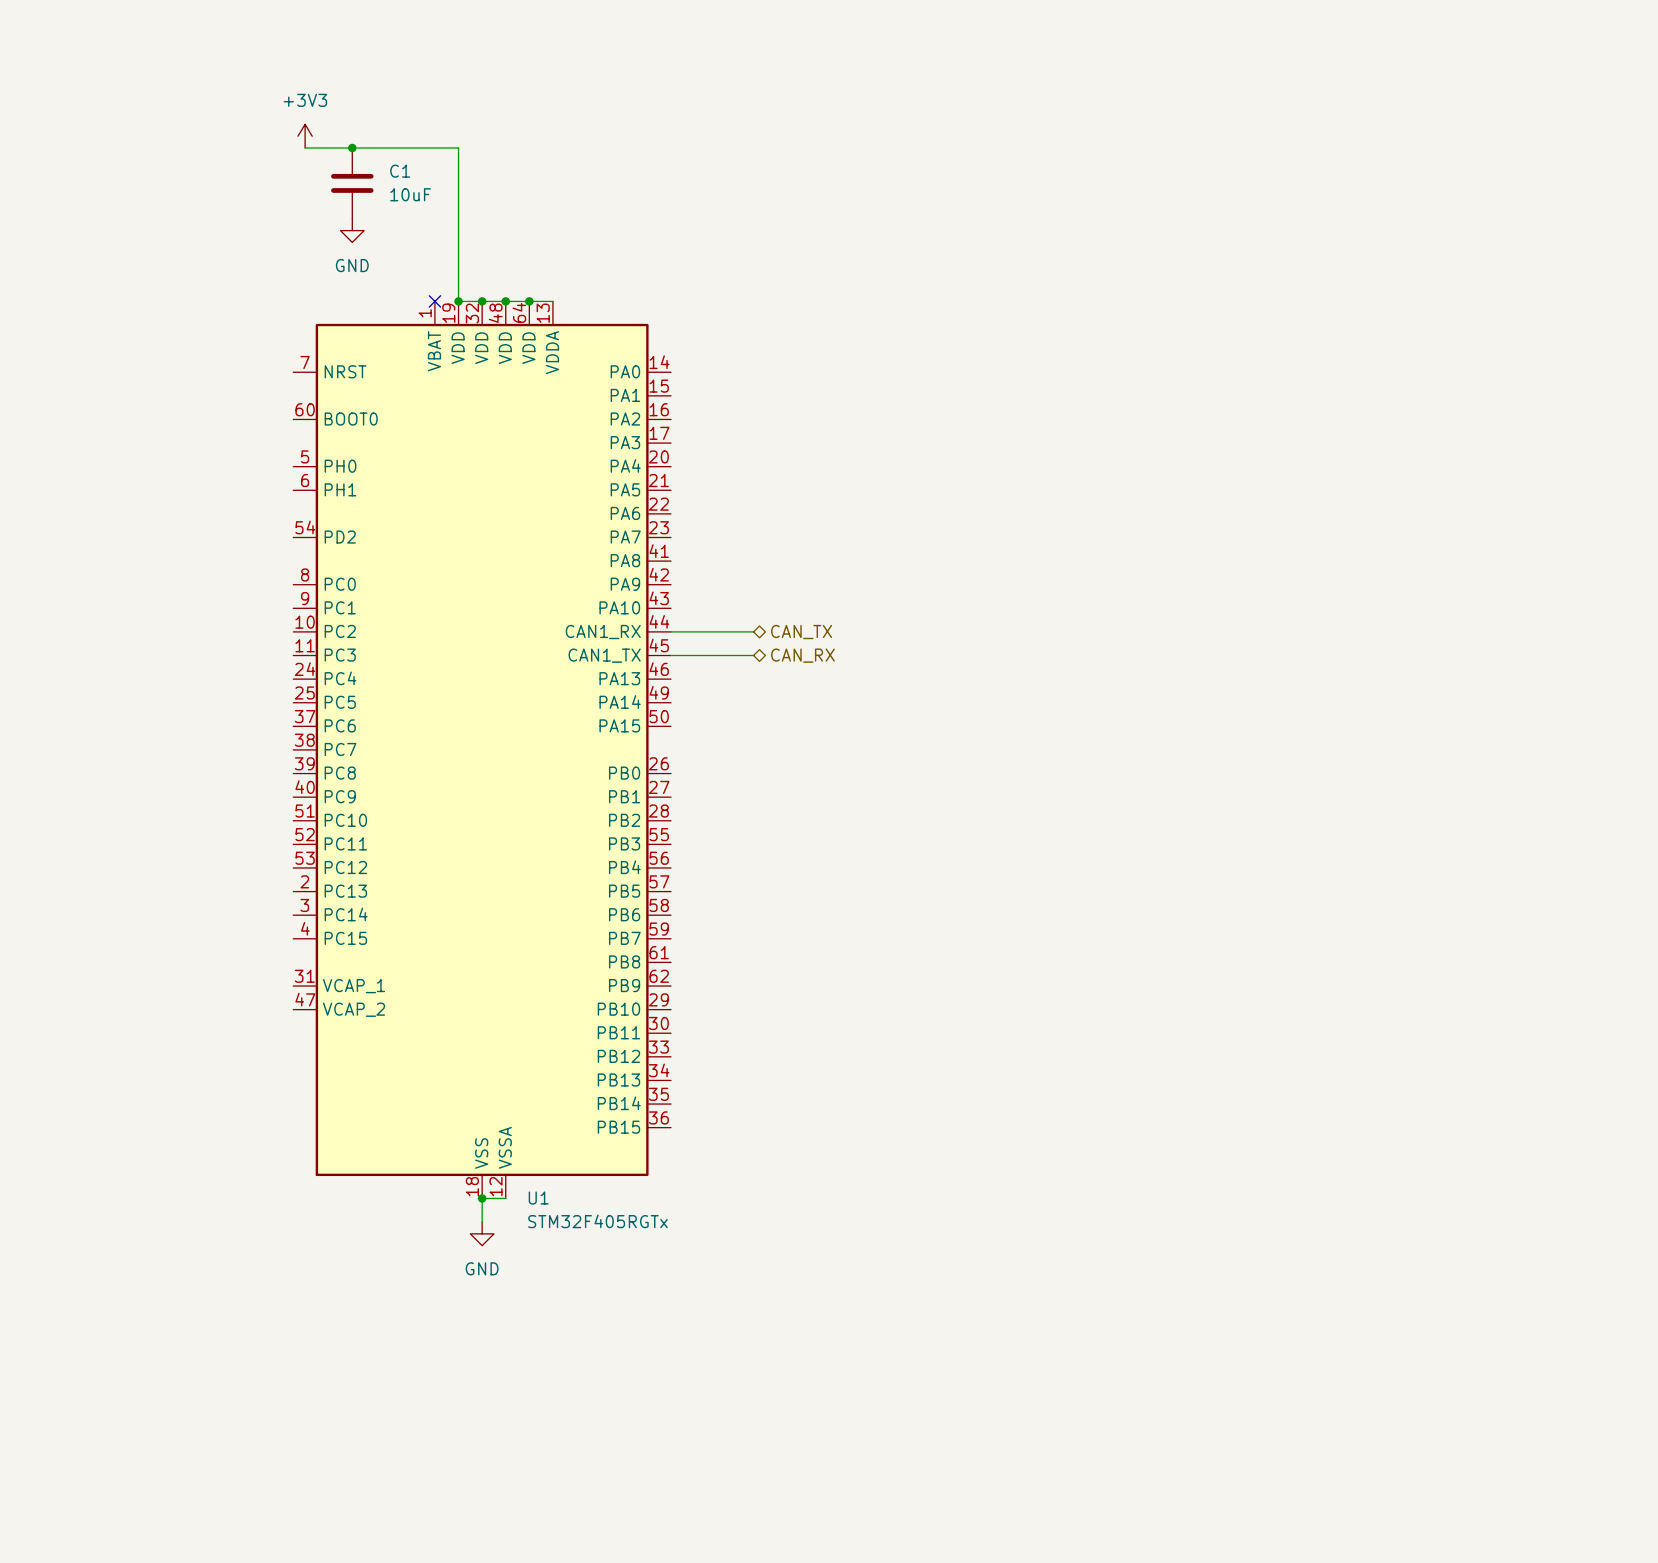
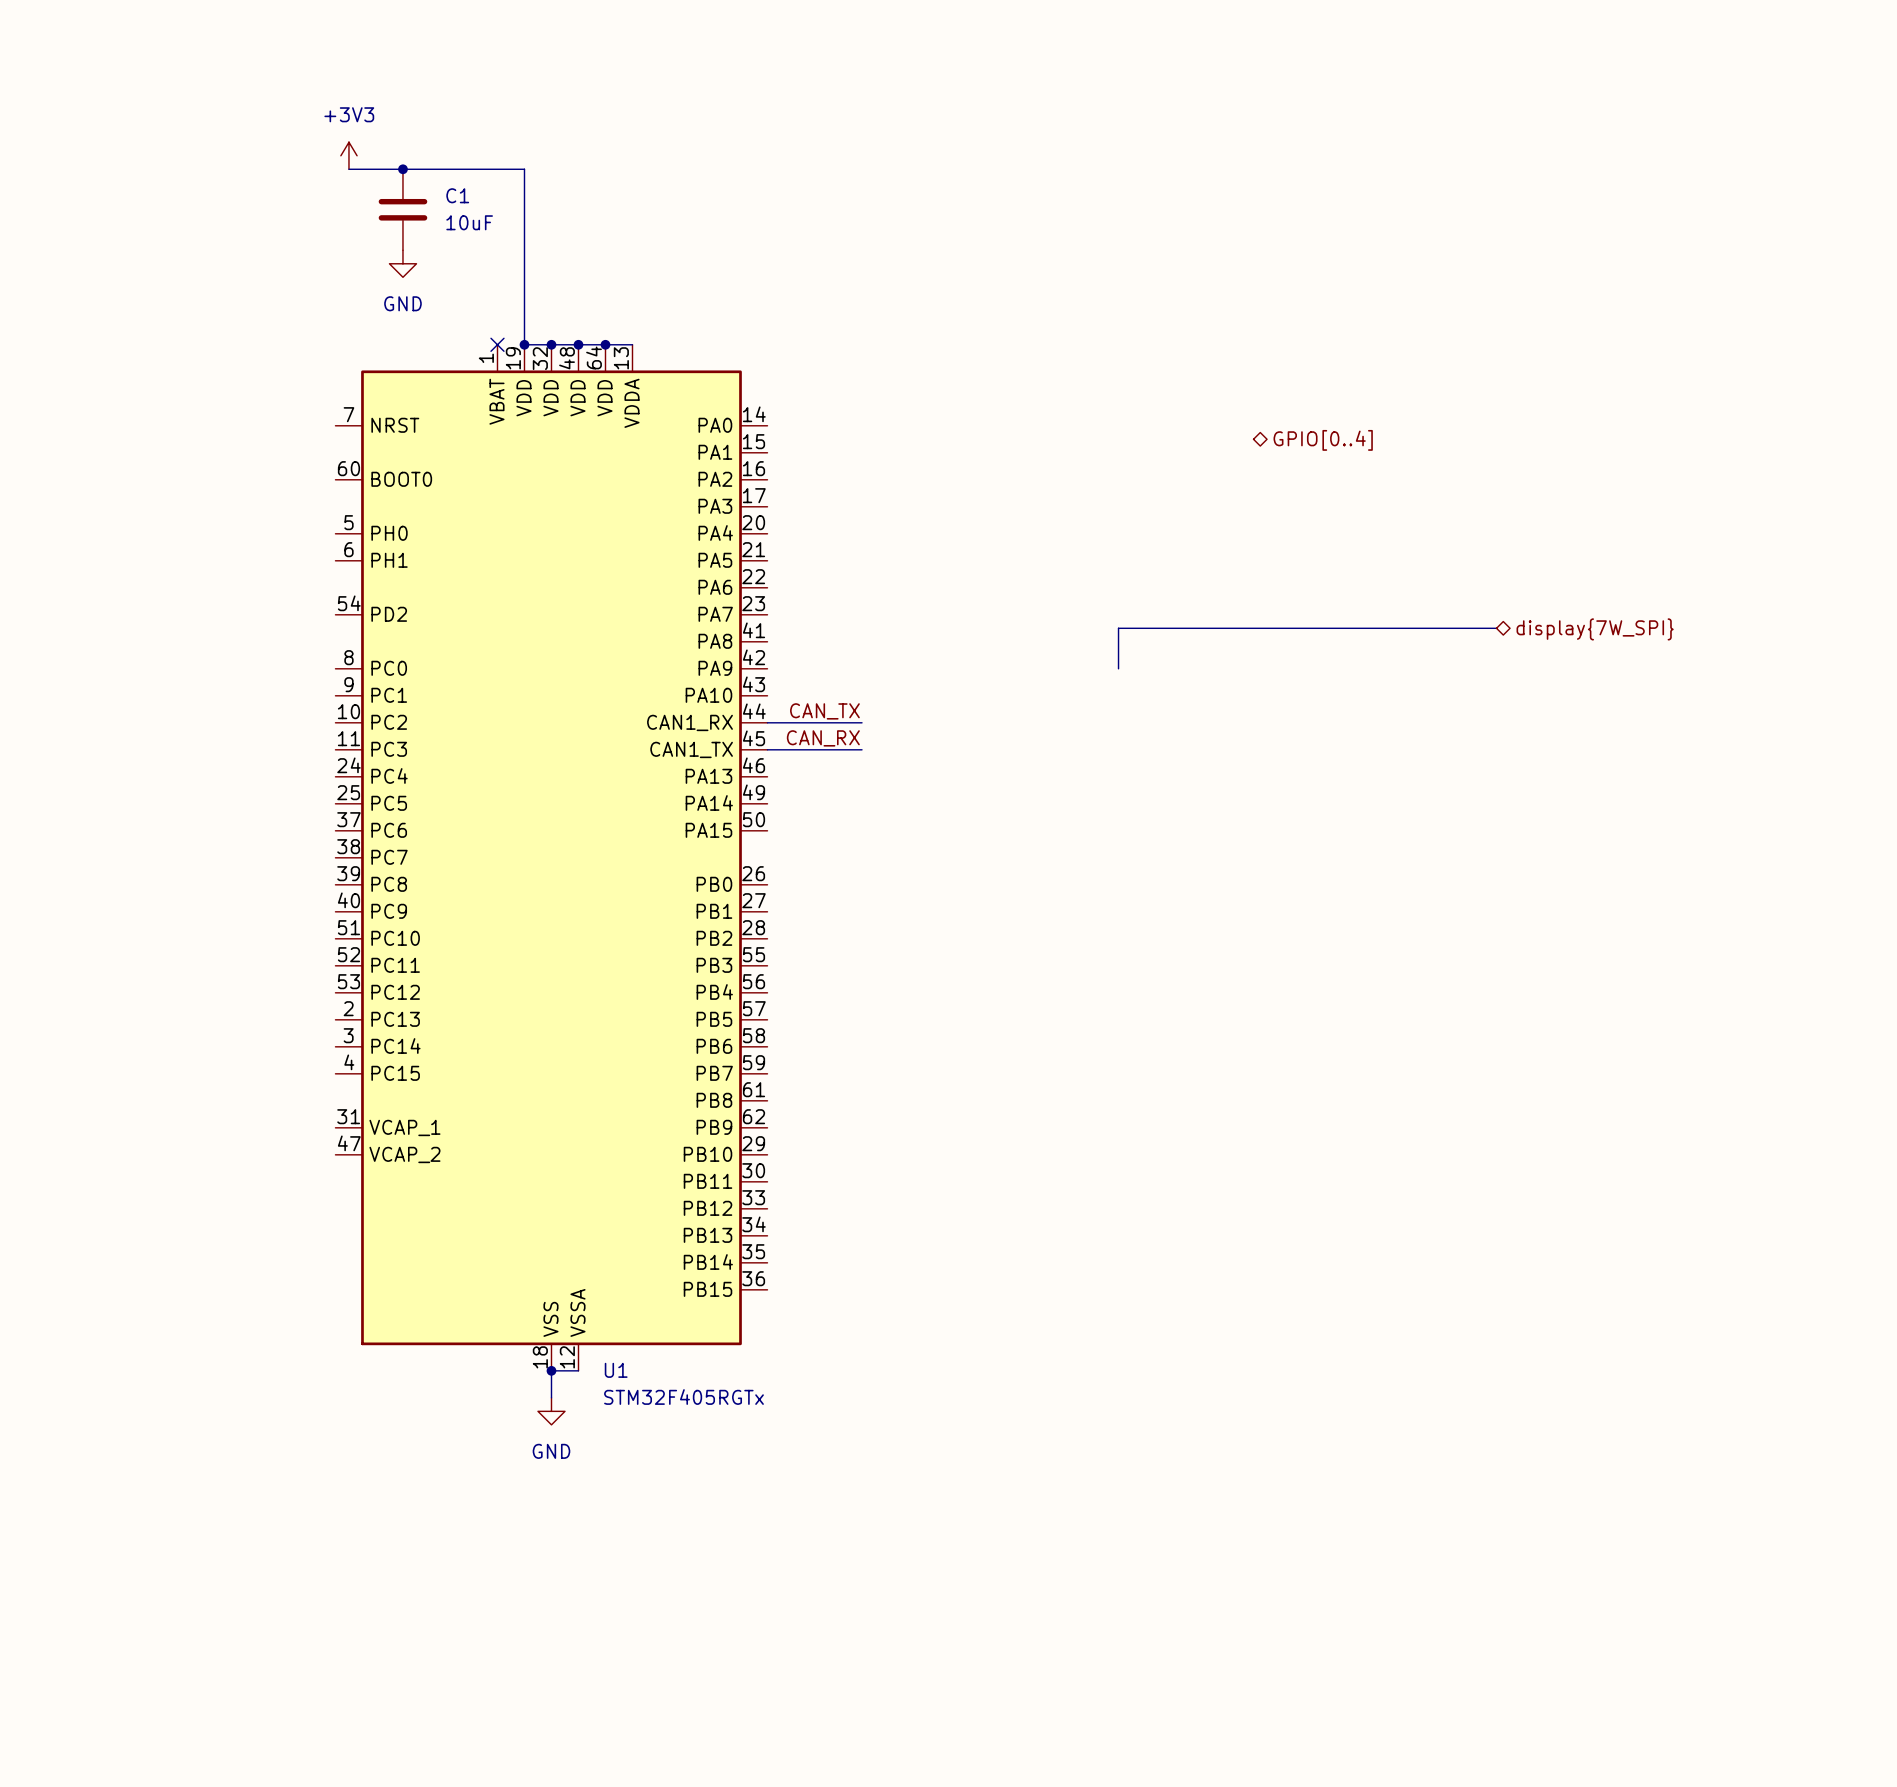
hierarchical label: none -> GPIO[0..4] (1323, 440)
bus: none -> (1496, 628) (1118, 628) (1118, 668)
hierarchical label: none -> display{7W_SPI} (1595, 629)
label: none -> CAN_TX (824, 711)
hierarchical label: CAN_TX (801, 632) -> none
label: none -> CAN_RX (823, 738)
hierarchical label: CAN_RX (802, 655) -> none

